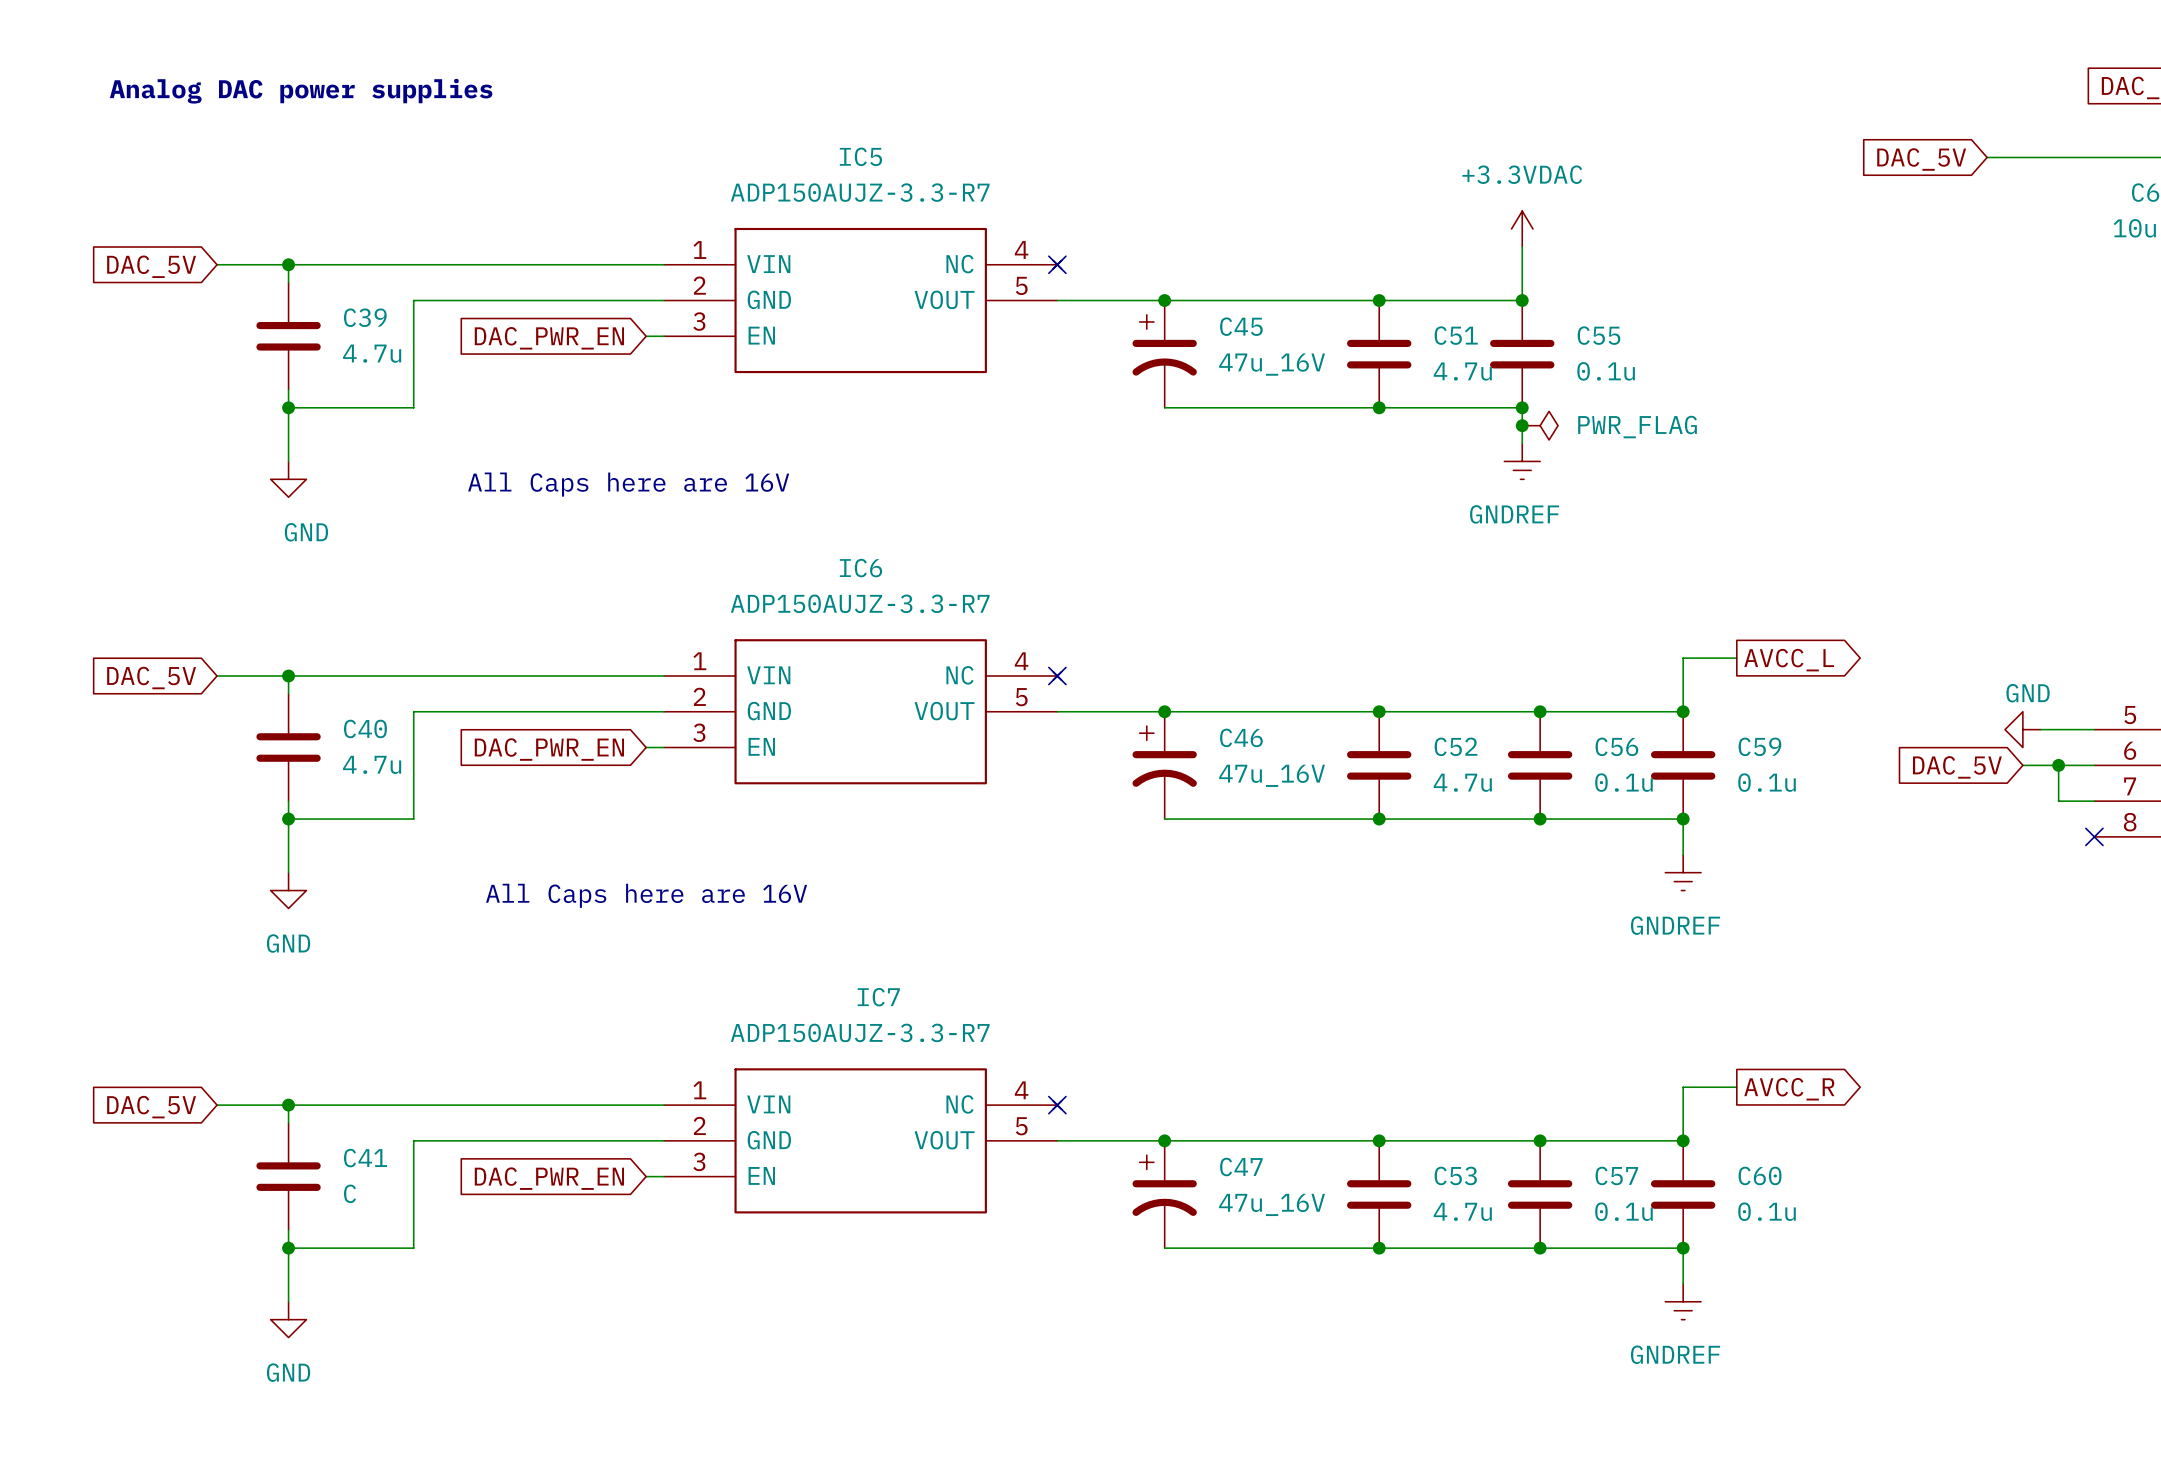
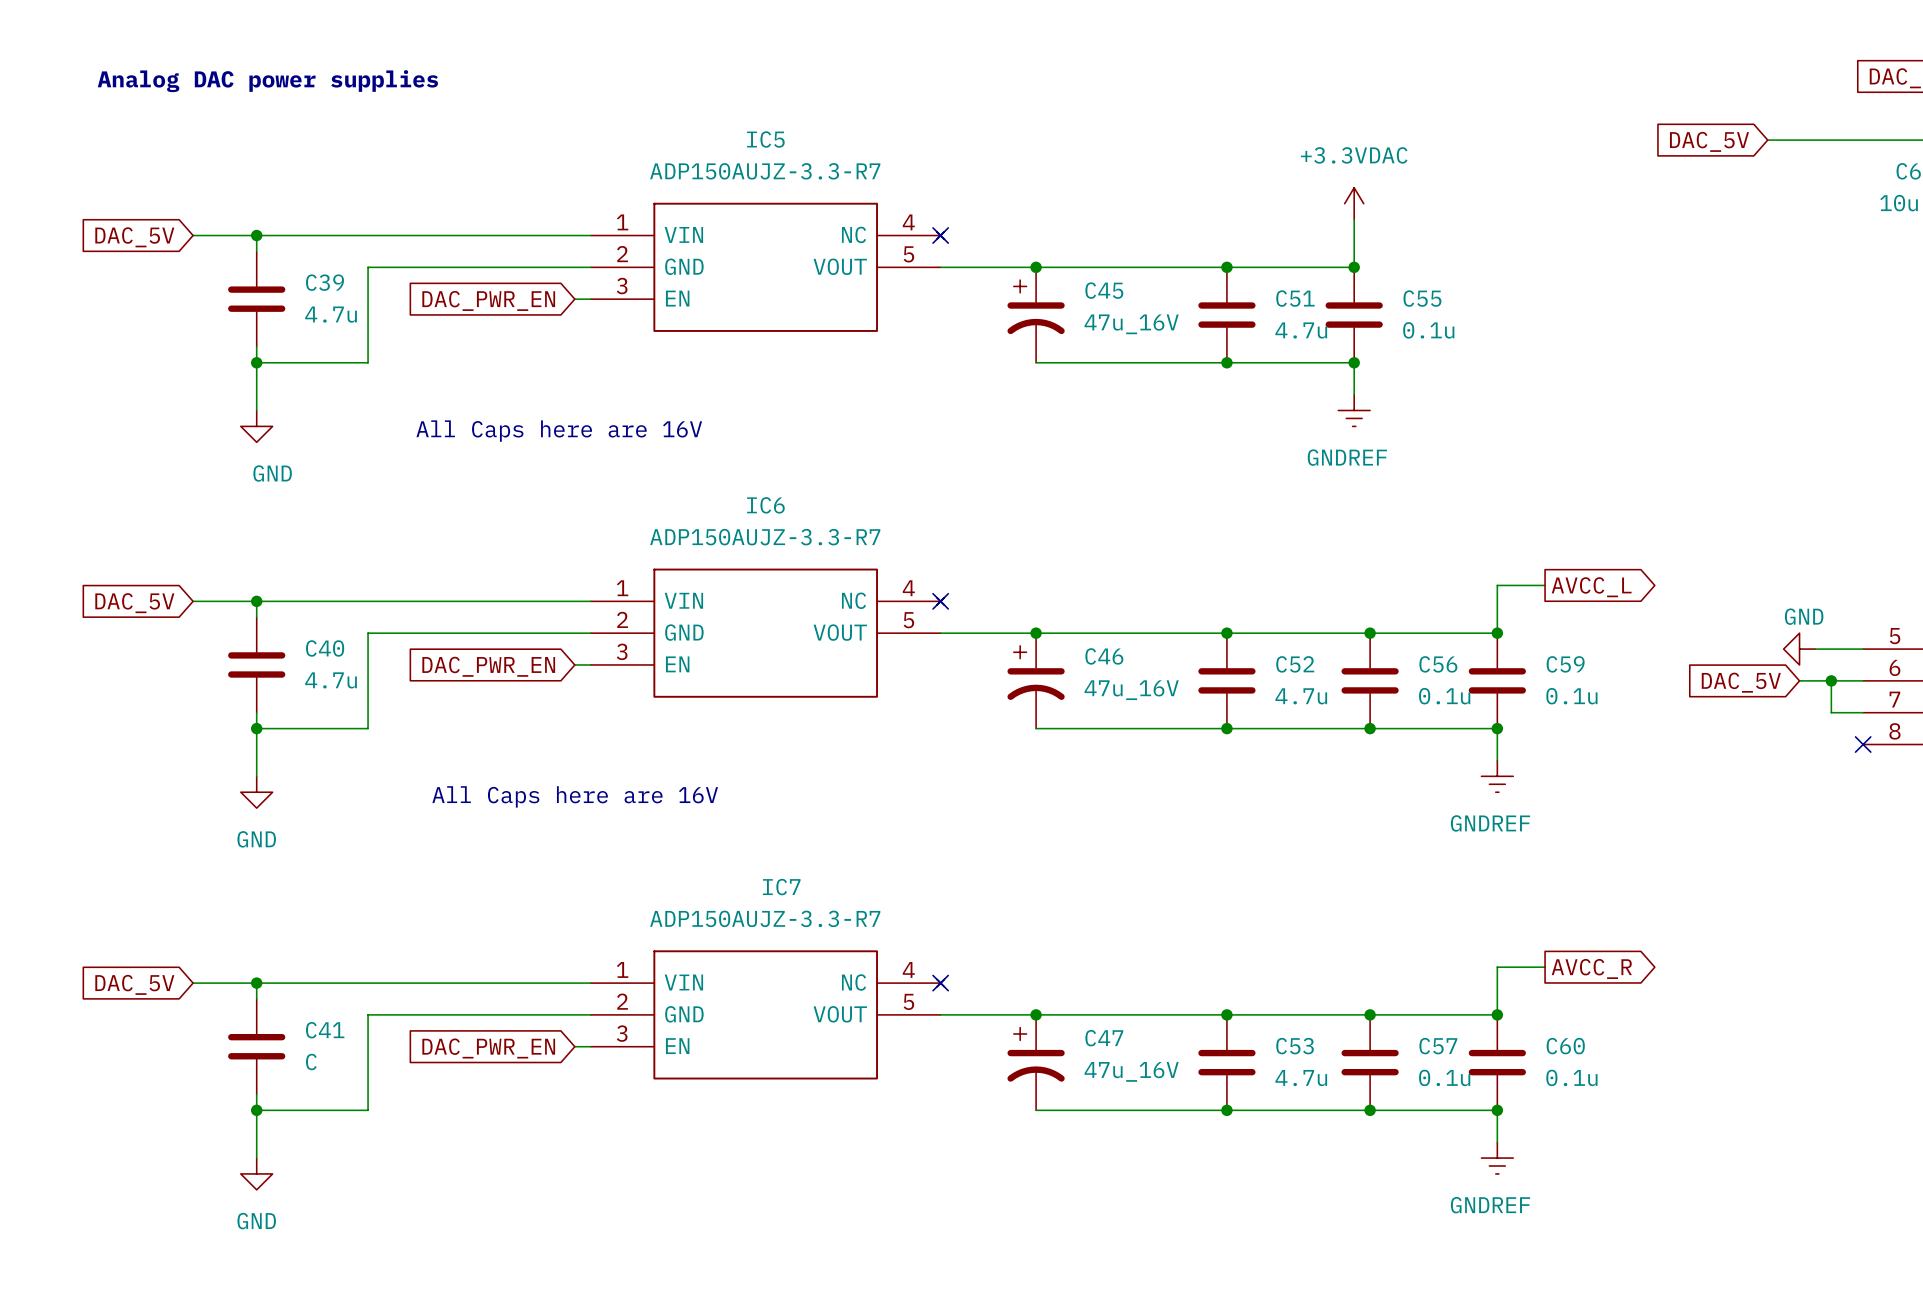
junction: (1522, 425) -> none
power symbol: PWR_FLAG (1540, 425) -> none

